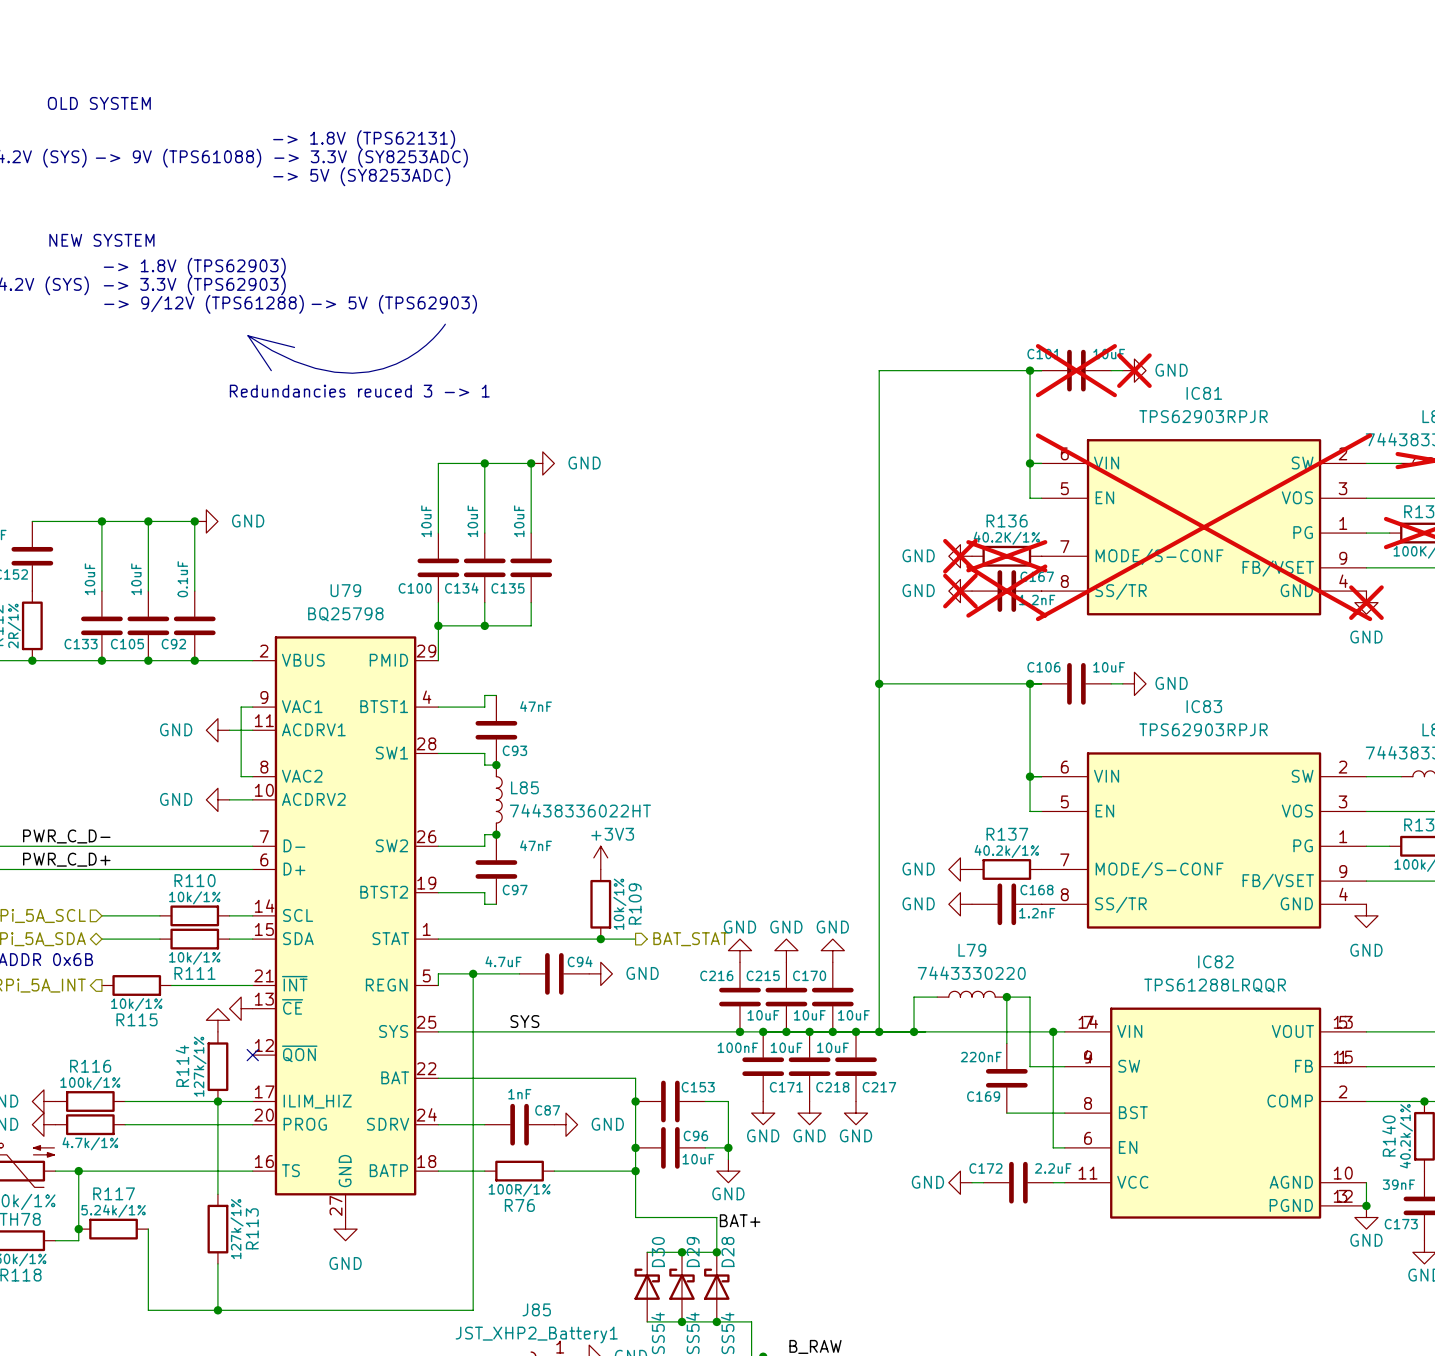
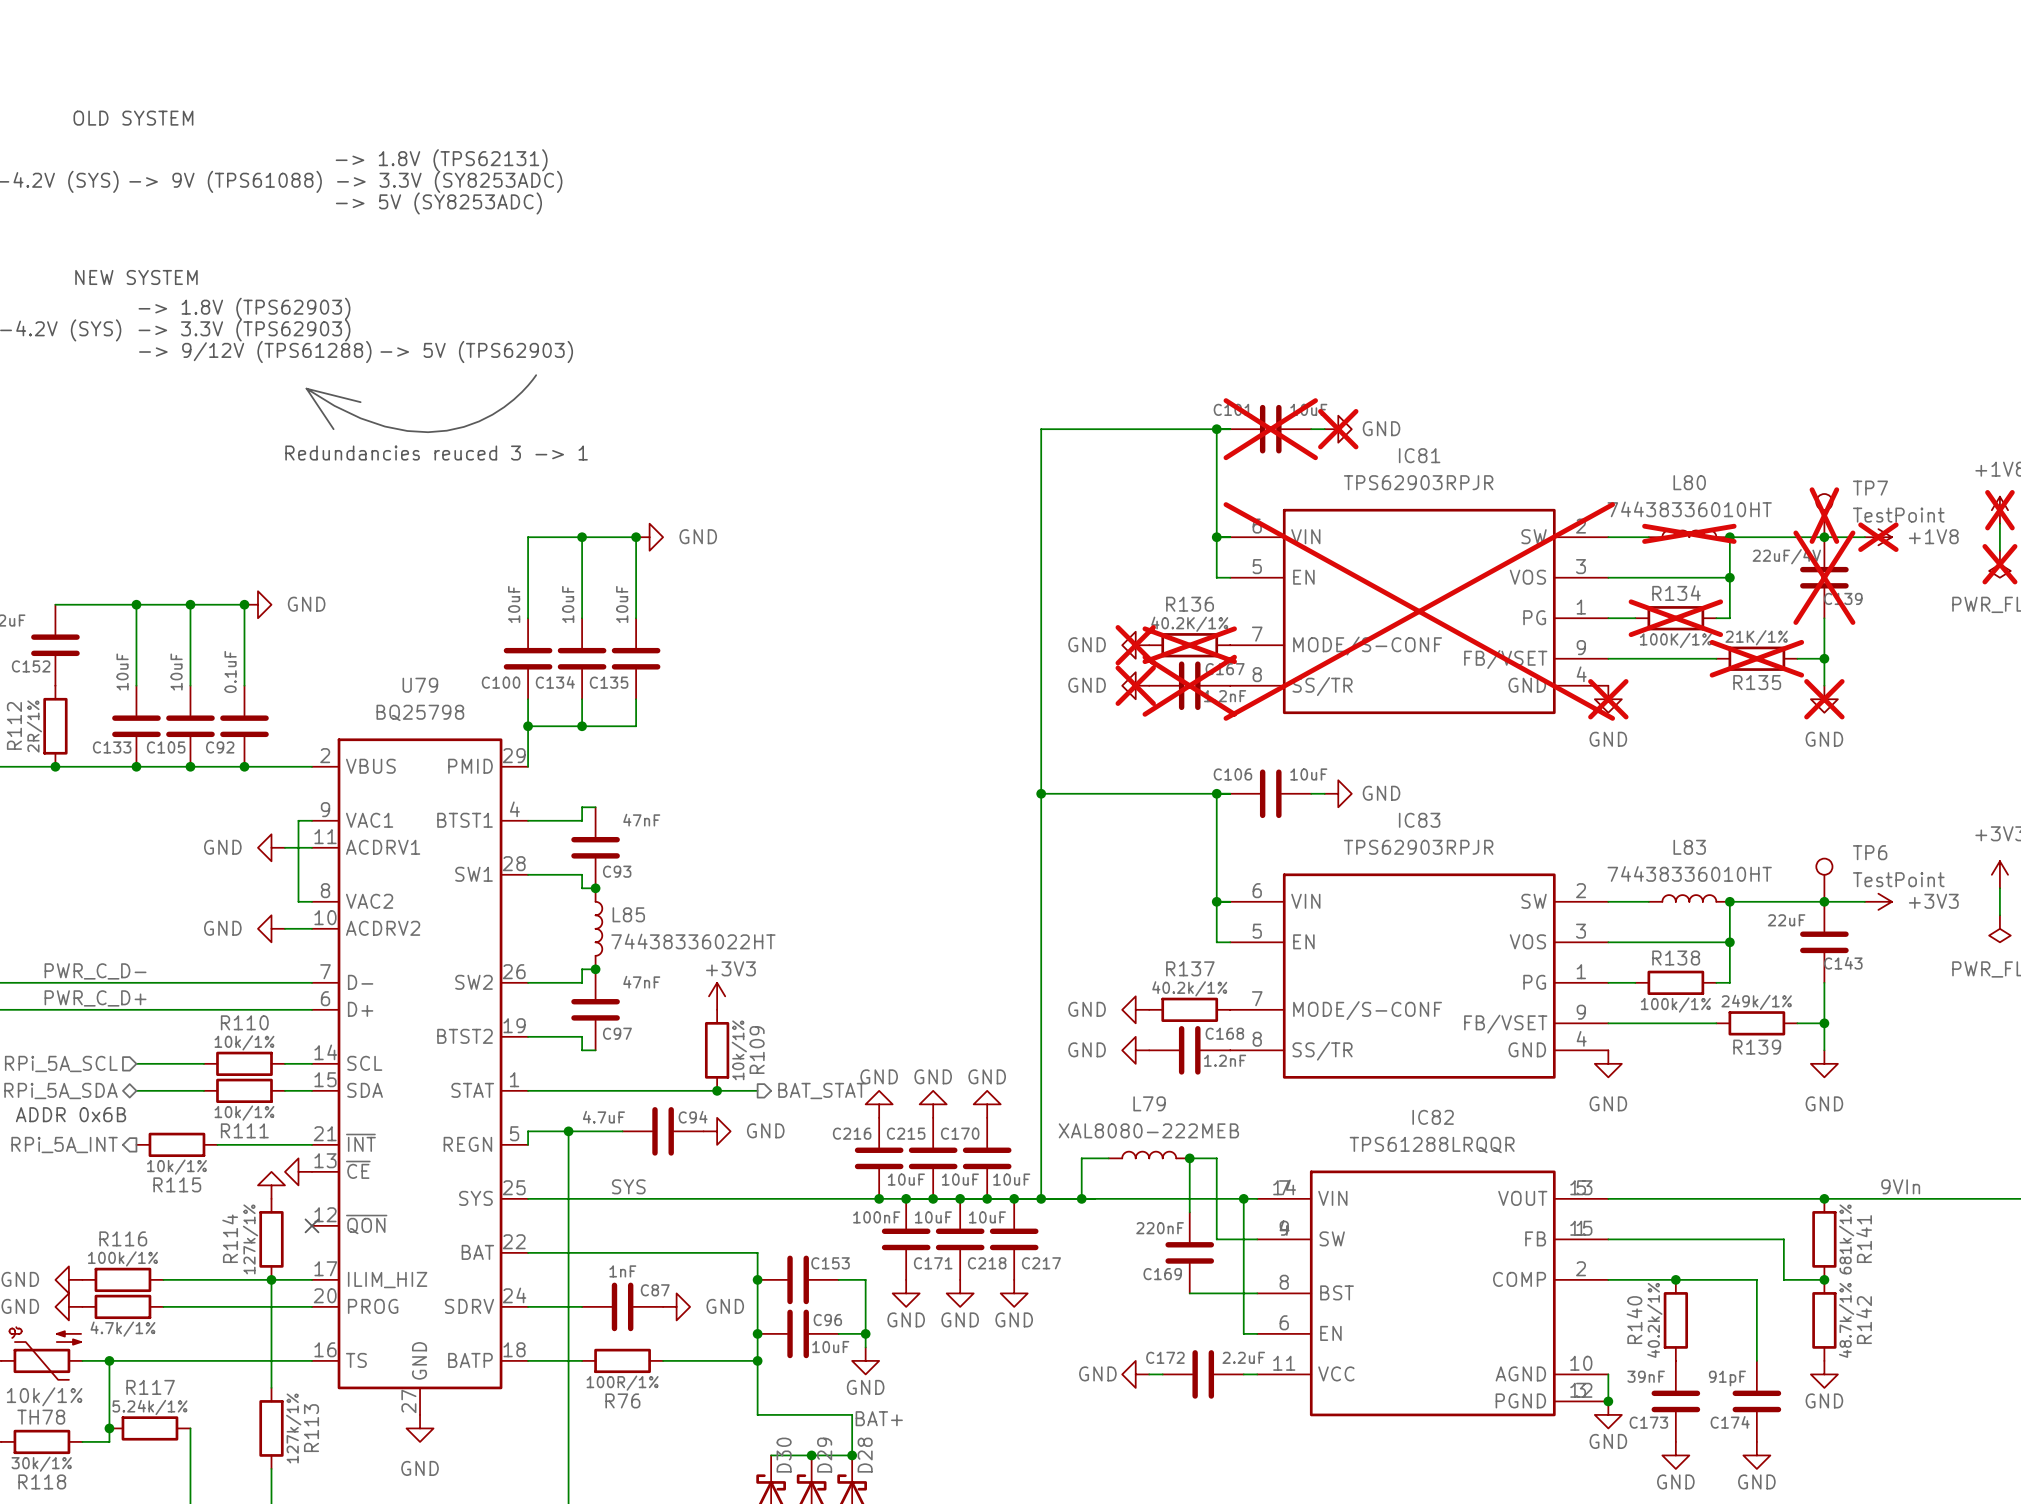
L79 value: 7443330220 (971, 973) -> XAL8080-222MEB (1148, 1130)

